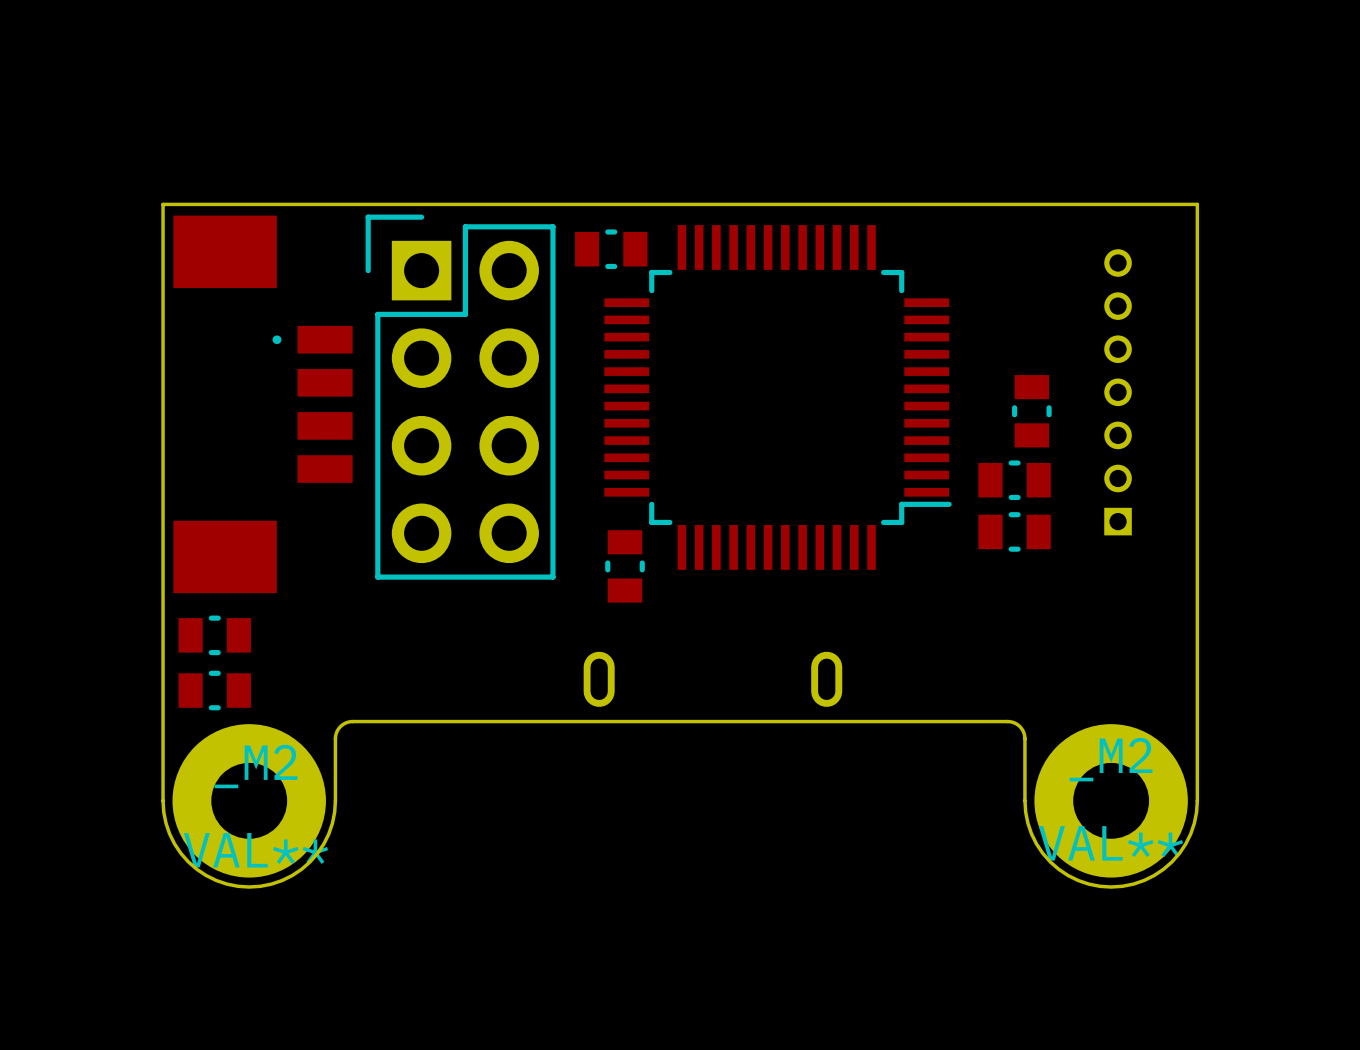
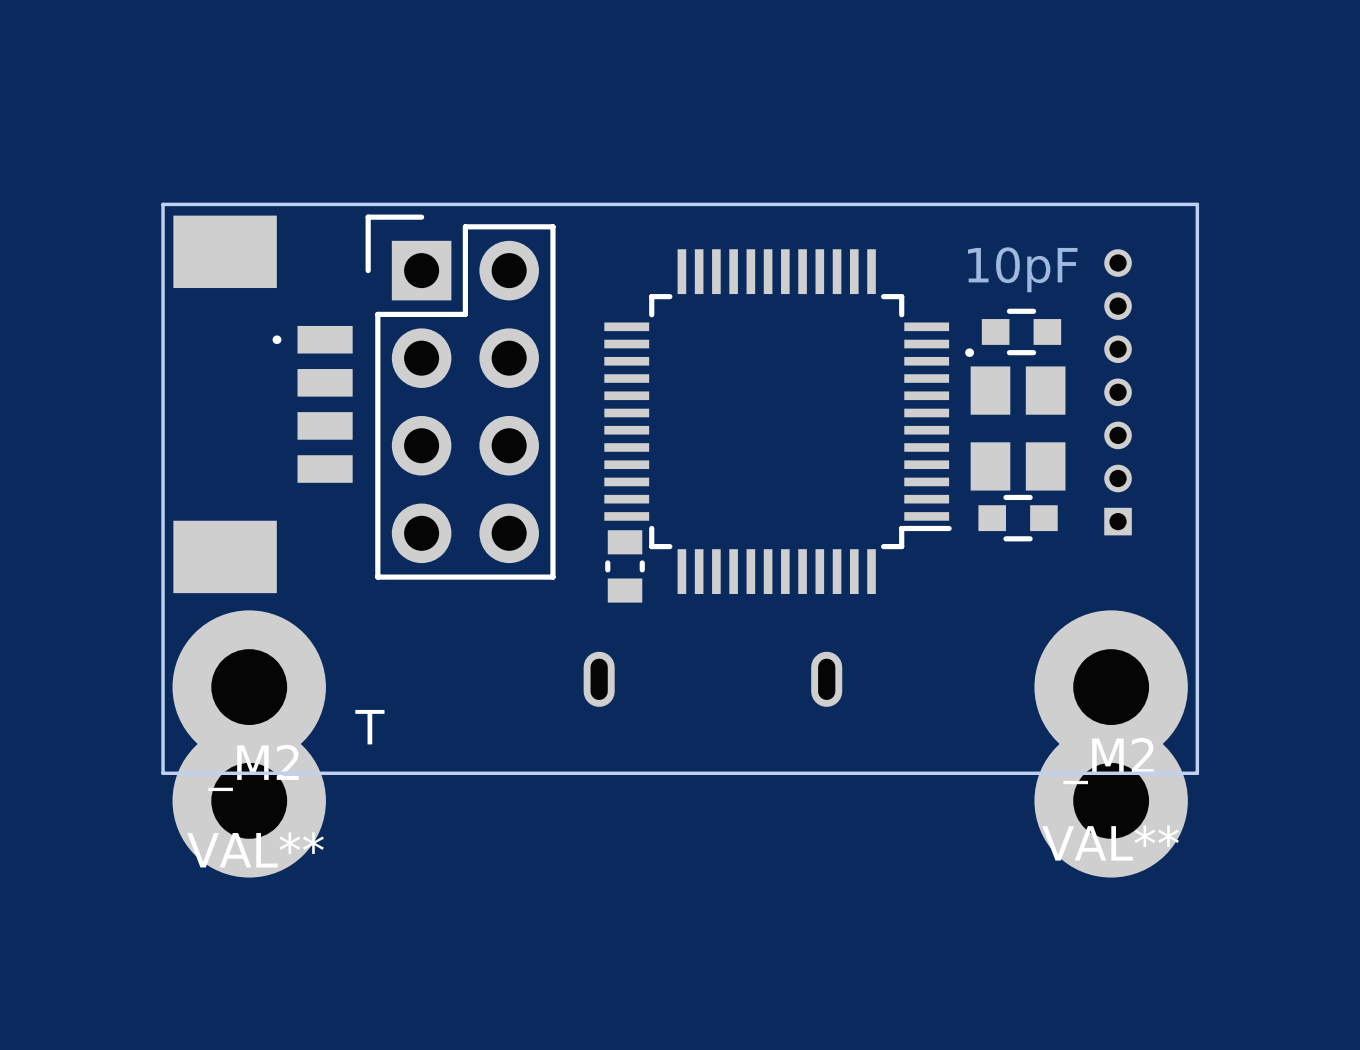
part: (611, 249) -> none
part: none -> 10pF (1021, 331)
part footprint: [1012, 375, 1052, 448] -> [965, 348, 1066, 491]
part position: (778, 397) -> (778, 421)
part: (1014, 480) -> none
part footprint: [978, 512, 1051, 552] -> [978, 494, 1058, 542]
part: (214, 635) -> none
part: none -> (249, 687)
part: none -> (1111, 687)
part: (214, 690) -> none
text: none -> T (369, 727)
board edge: (163, 773) (163, 800) (165, 823) (180, 853) (206, 875) (226, 884) (249, 887) (271, 884) (292, 875) (310, 861) (323, 843) (334, 812) (336, 734) (340, 726) (350, 721) (1012, 722) (1019, 726) (1024, 734) (1025, 812) (1036, 843) (1050, 861) (1068, 875) (1088, 884) (1111, 887) (1133, 884) (1154, 875) (1179, 853) (1194, 823) (1197, 800) (1197, 773) -> (163, 773) (1197, 773)

